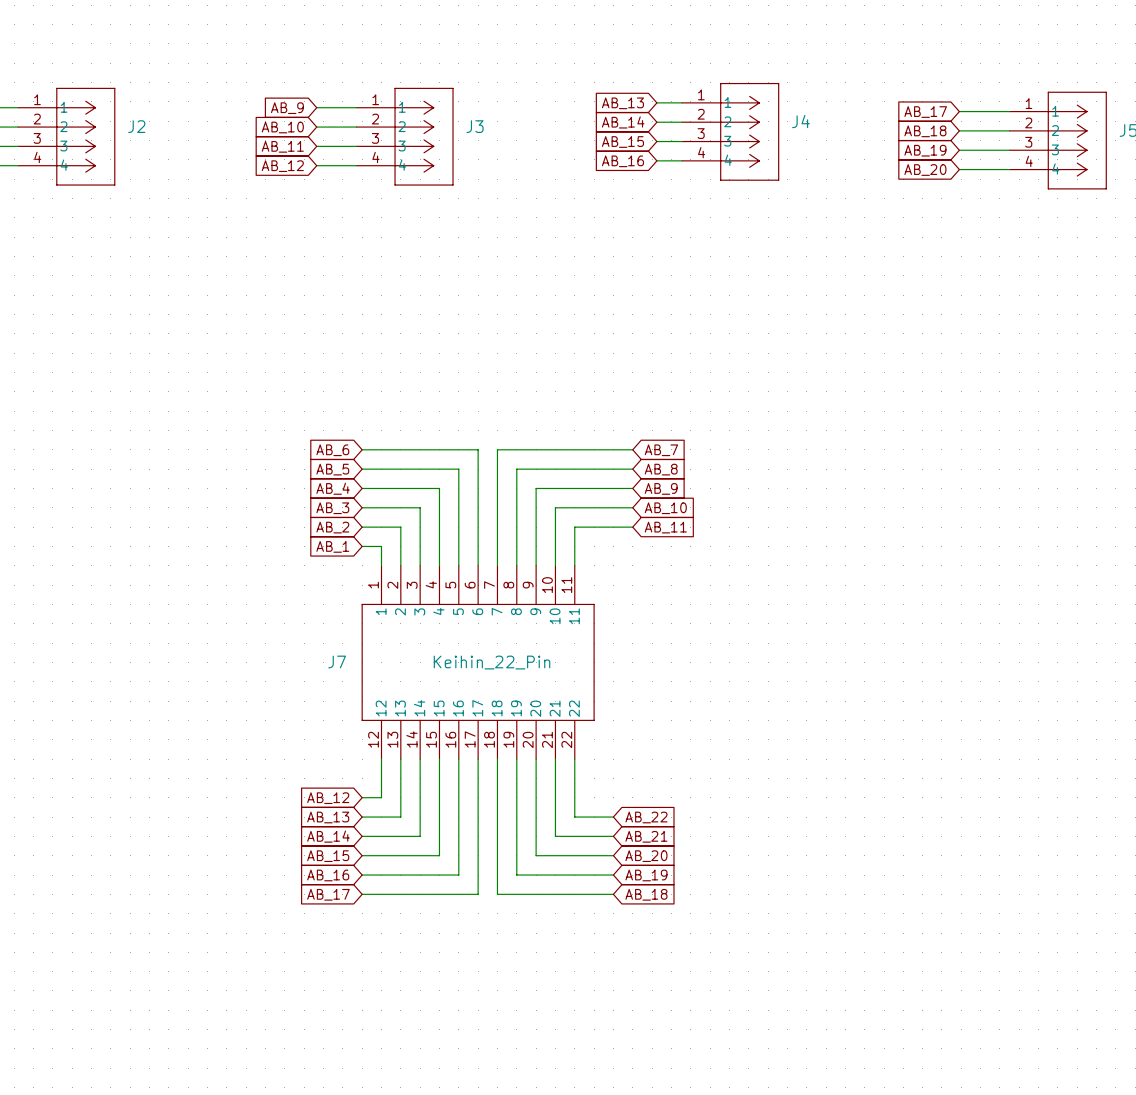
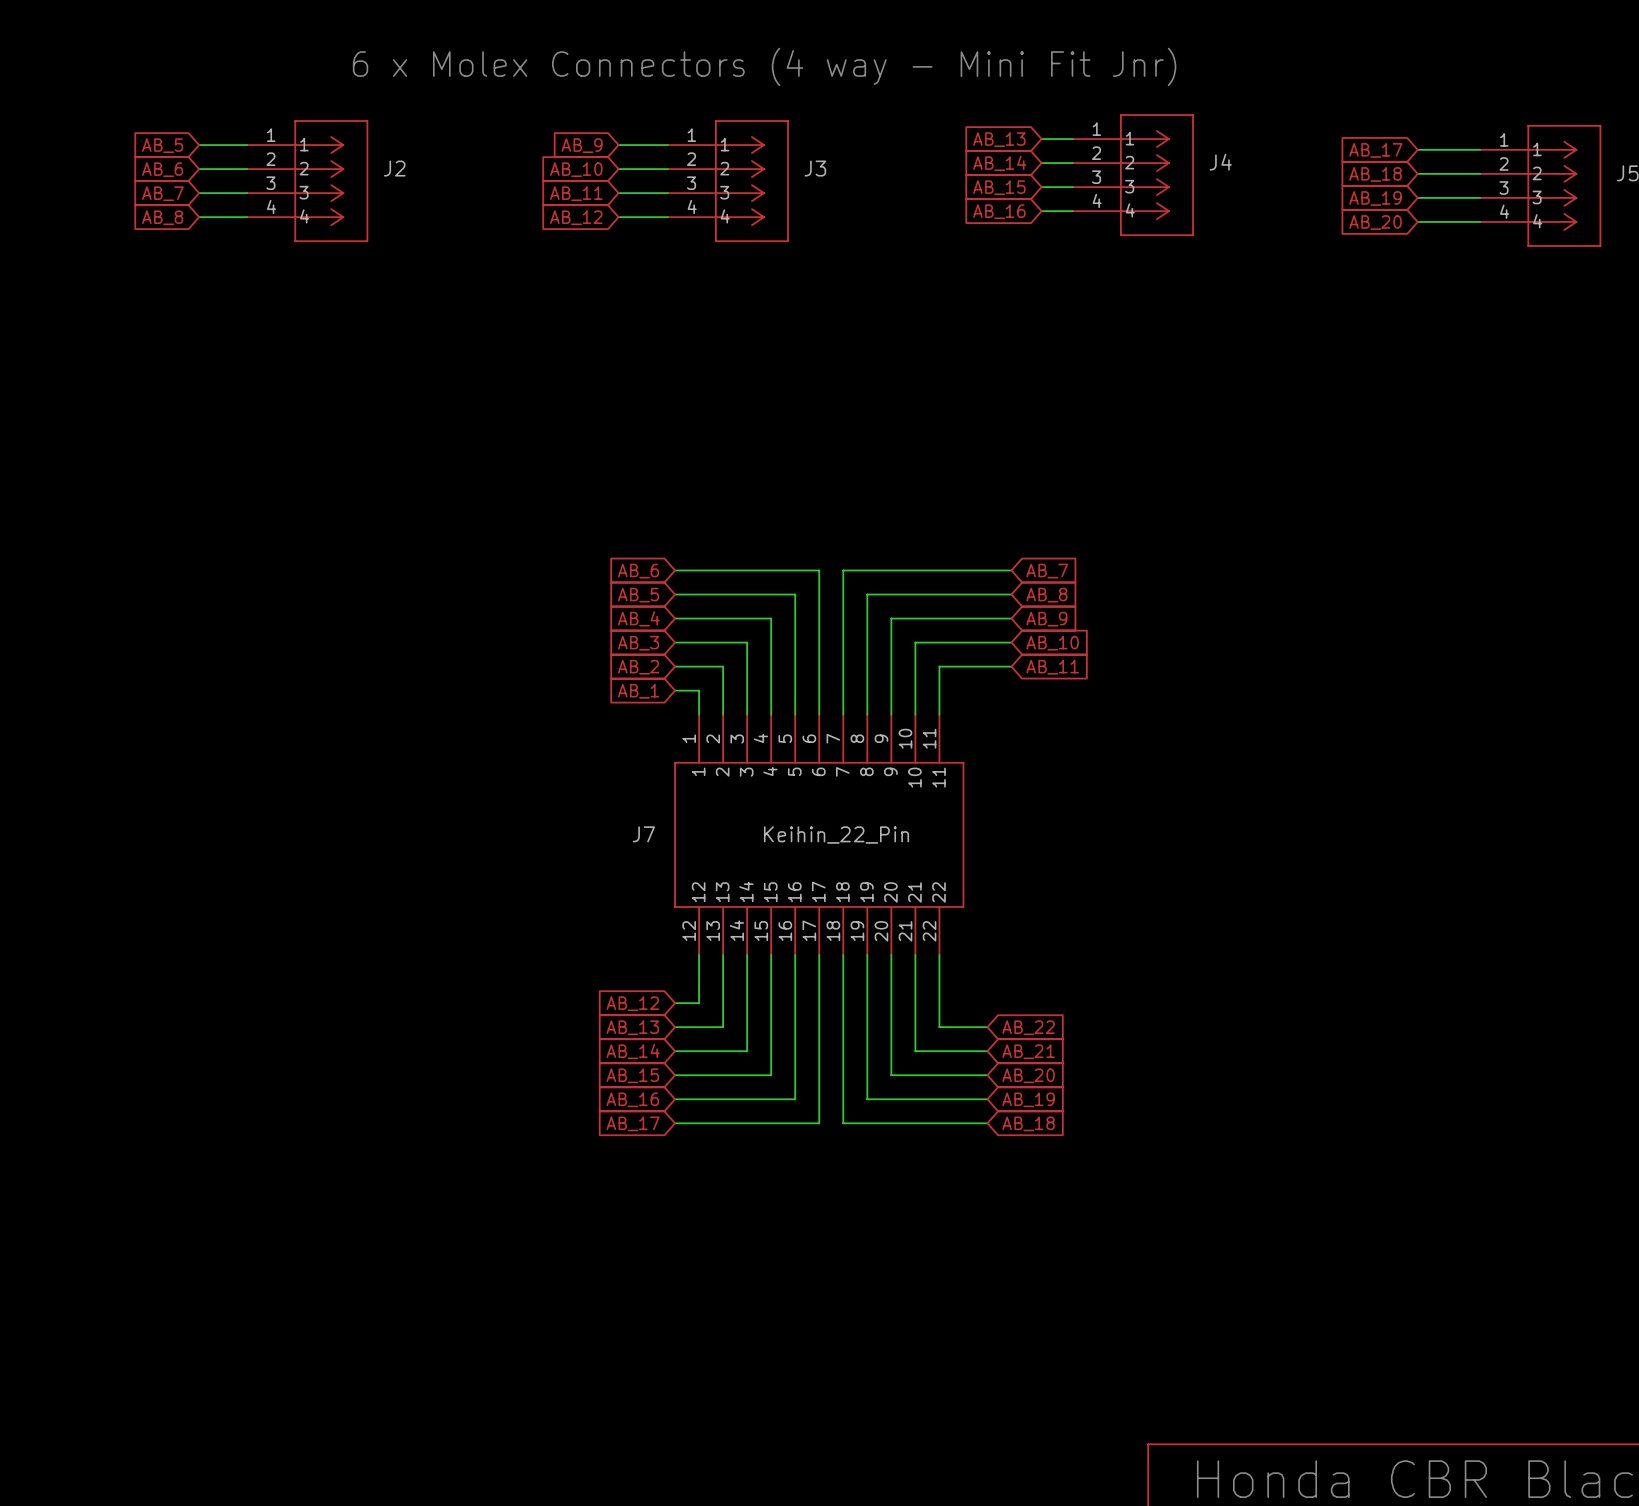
text: none -> 6 x Molex Connectors (4 way - Mini Fit Jnr) (764, 66)

